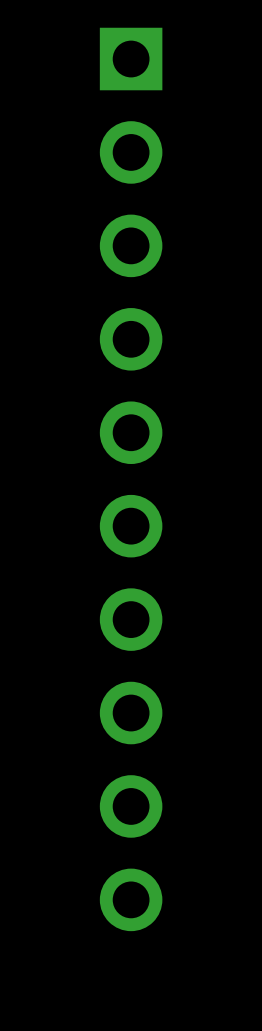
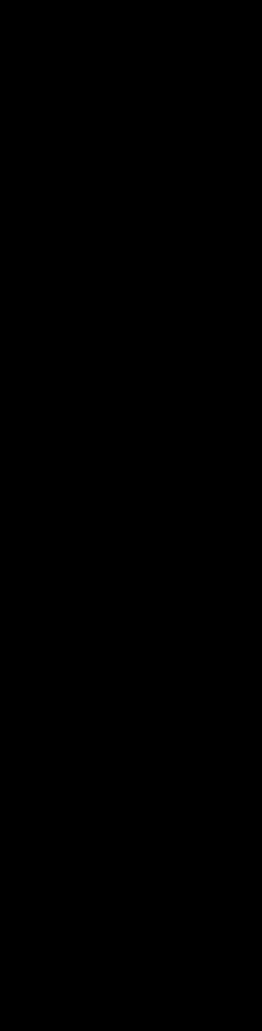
part: (131, 479) -> none

